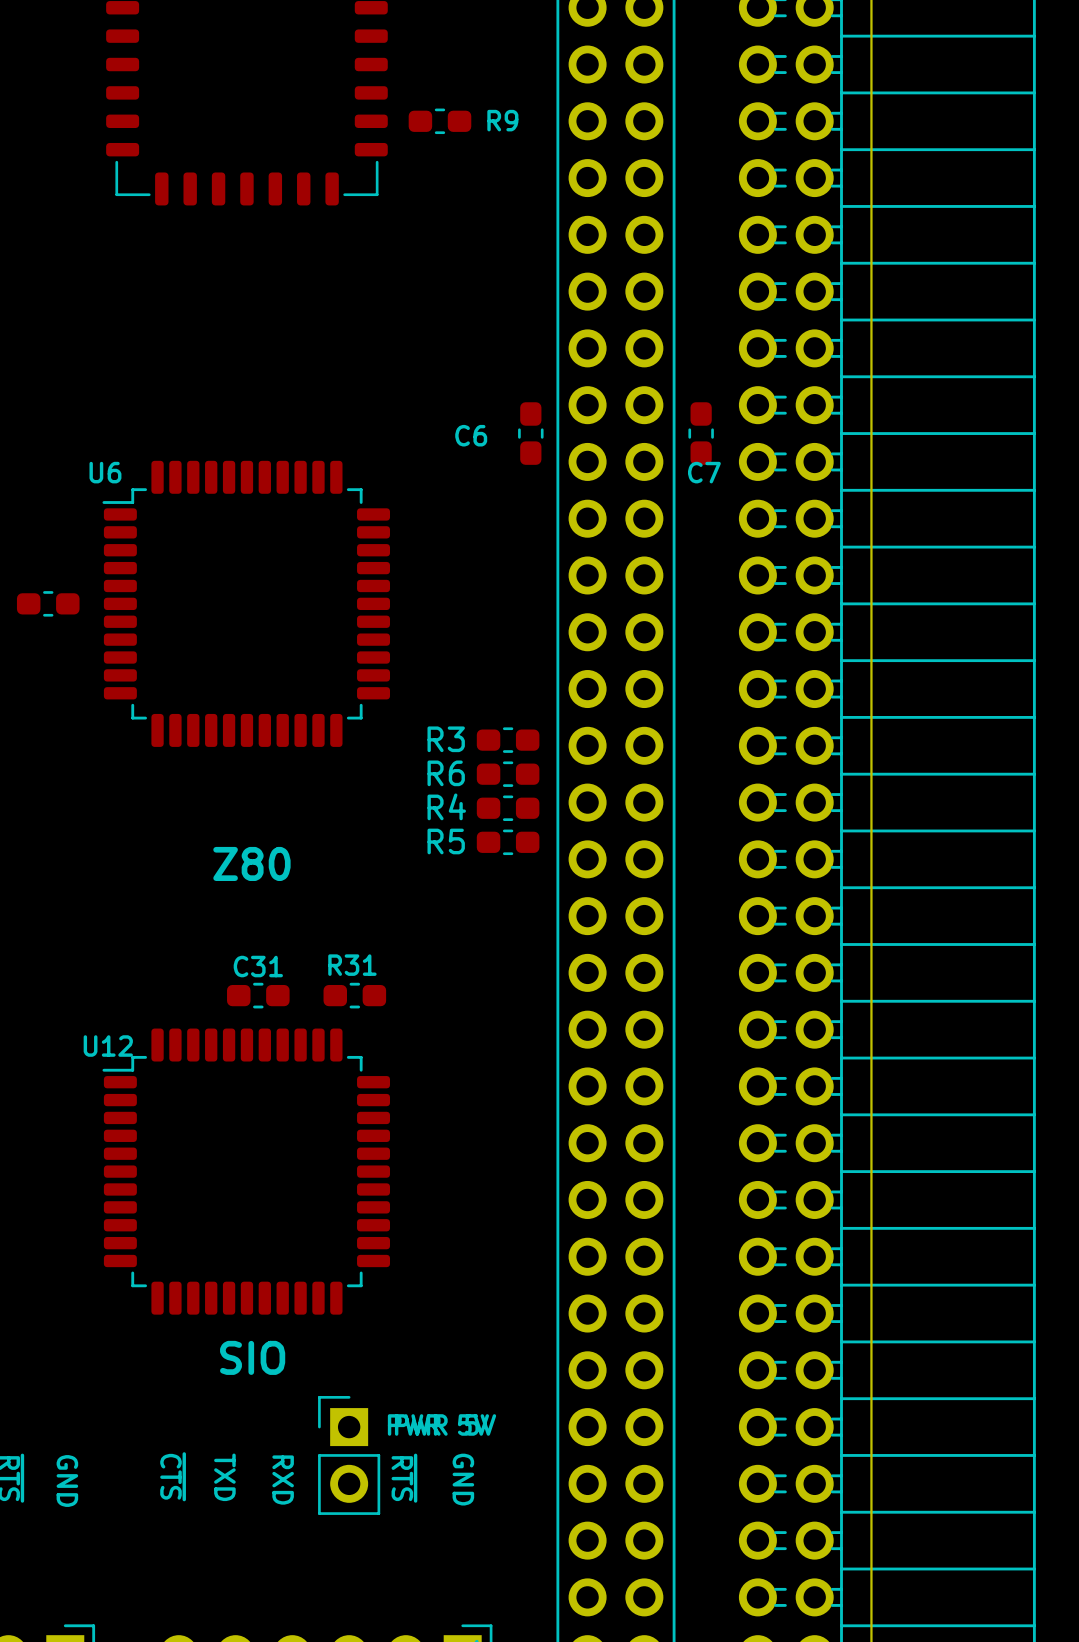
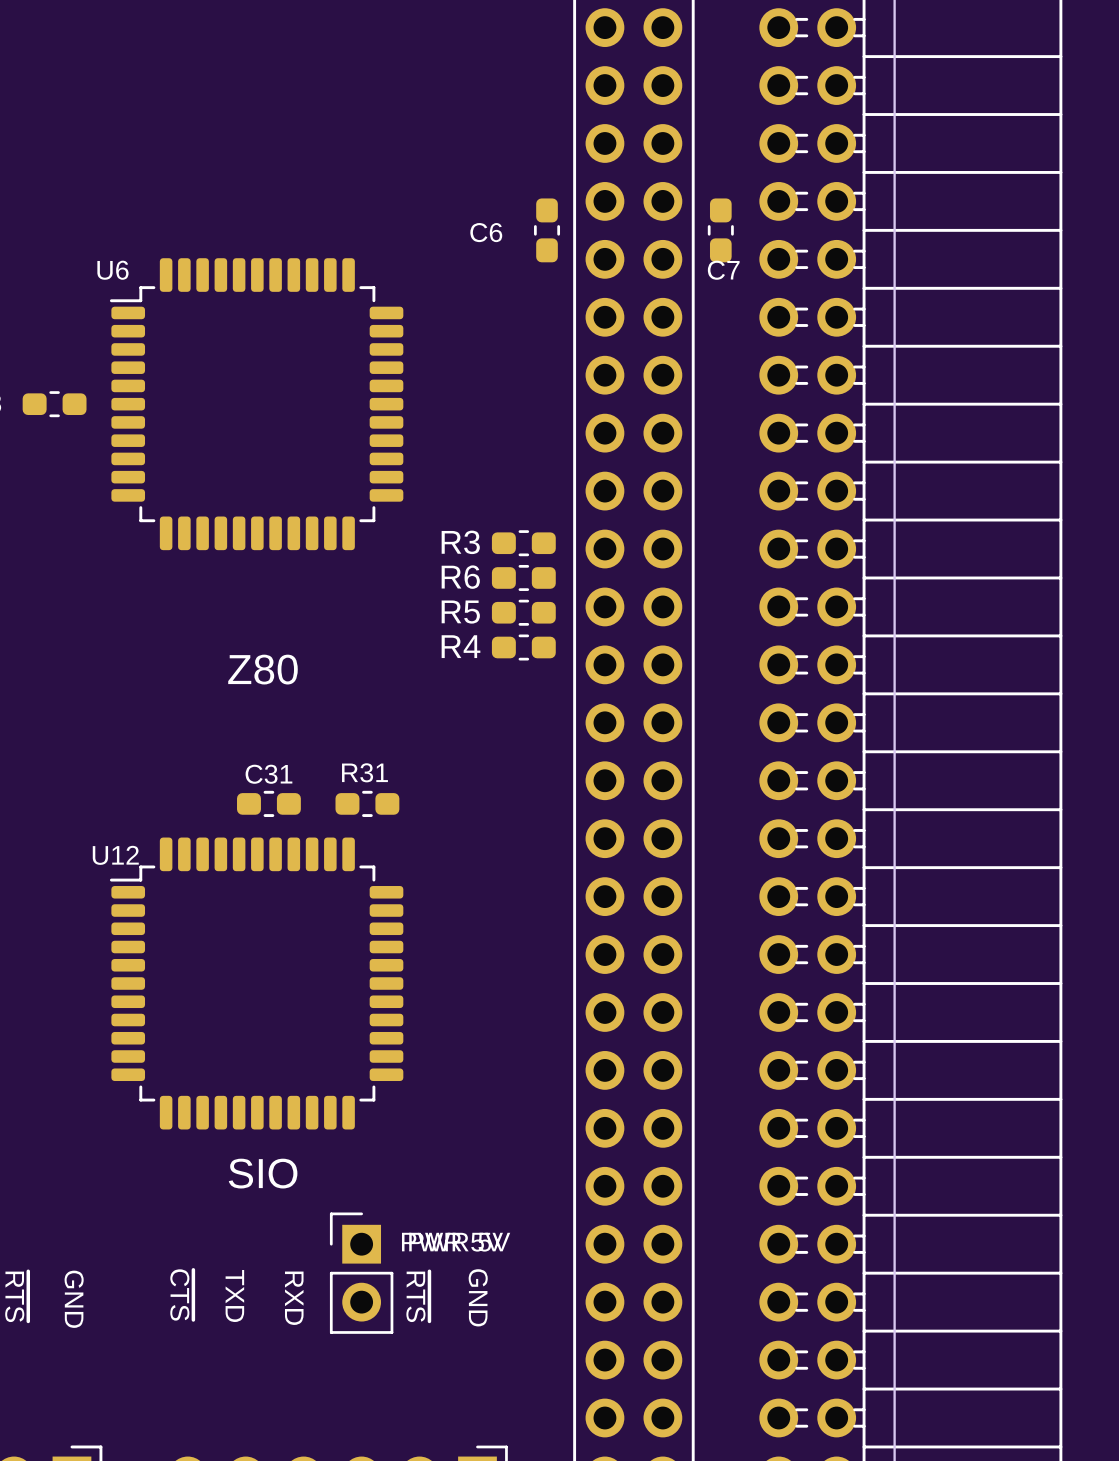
R4 name: R4 (446, 806) -> R5 (460, 612)
R5 name: R5 (446, 841) -> R4 (460, 646)

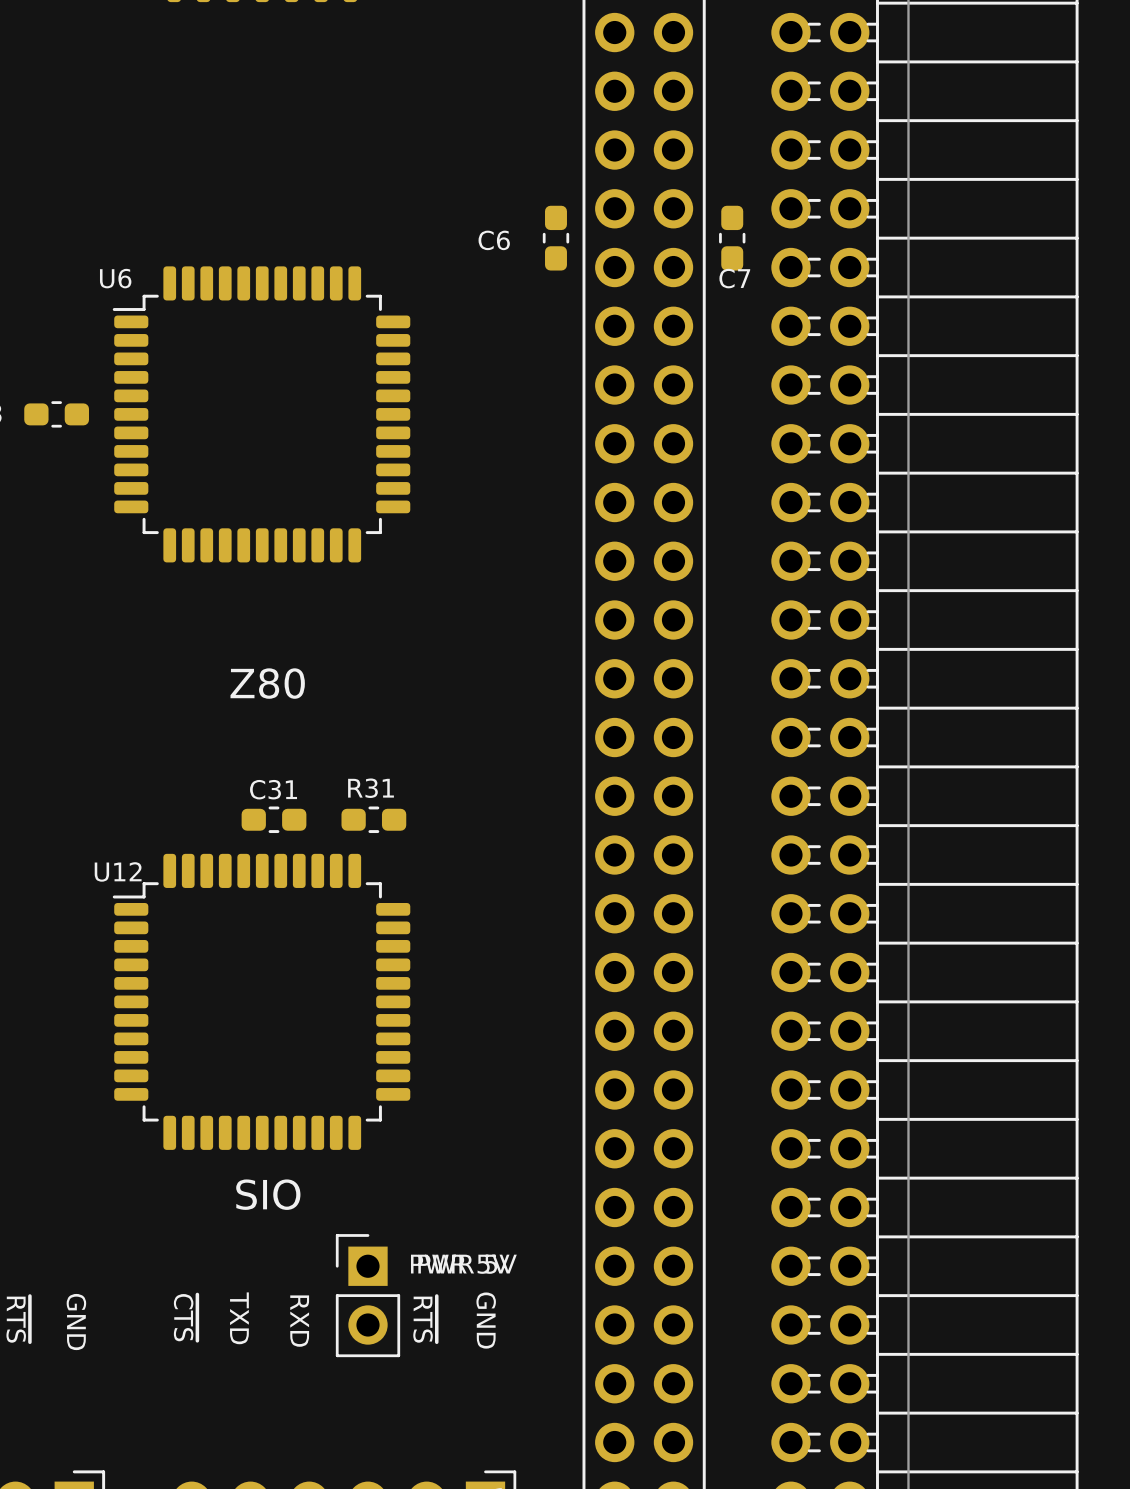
R3: (523, 543) -> none
R6: (523, 577) -> none
R5: (523, 612) -> none
R4: (523, 647) -> none

